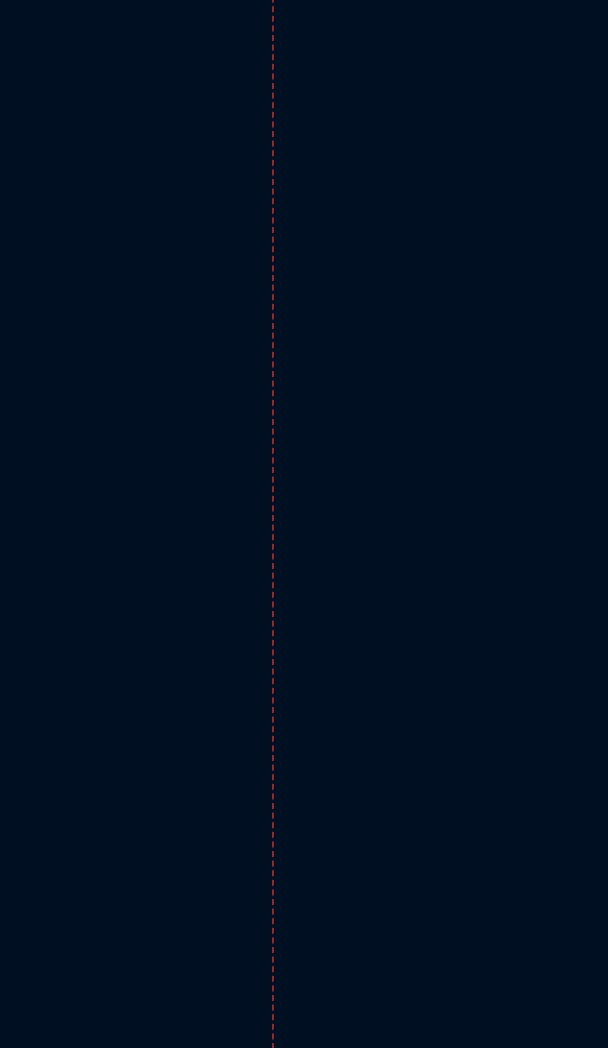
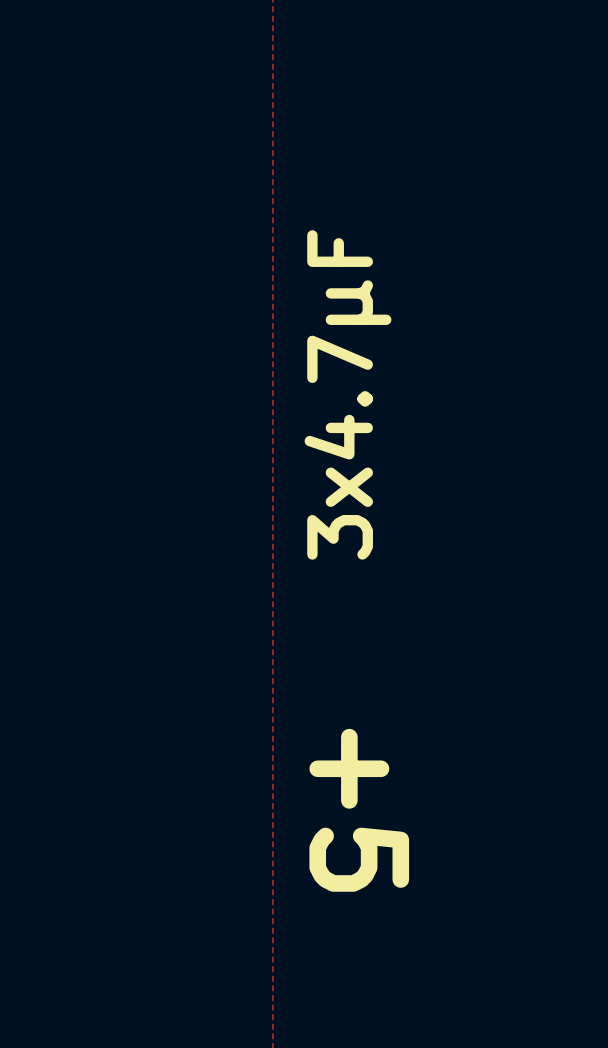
text: none -> 3x4.7μF (348, 394)
text: none -> +5 (359, 810)

